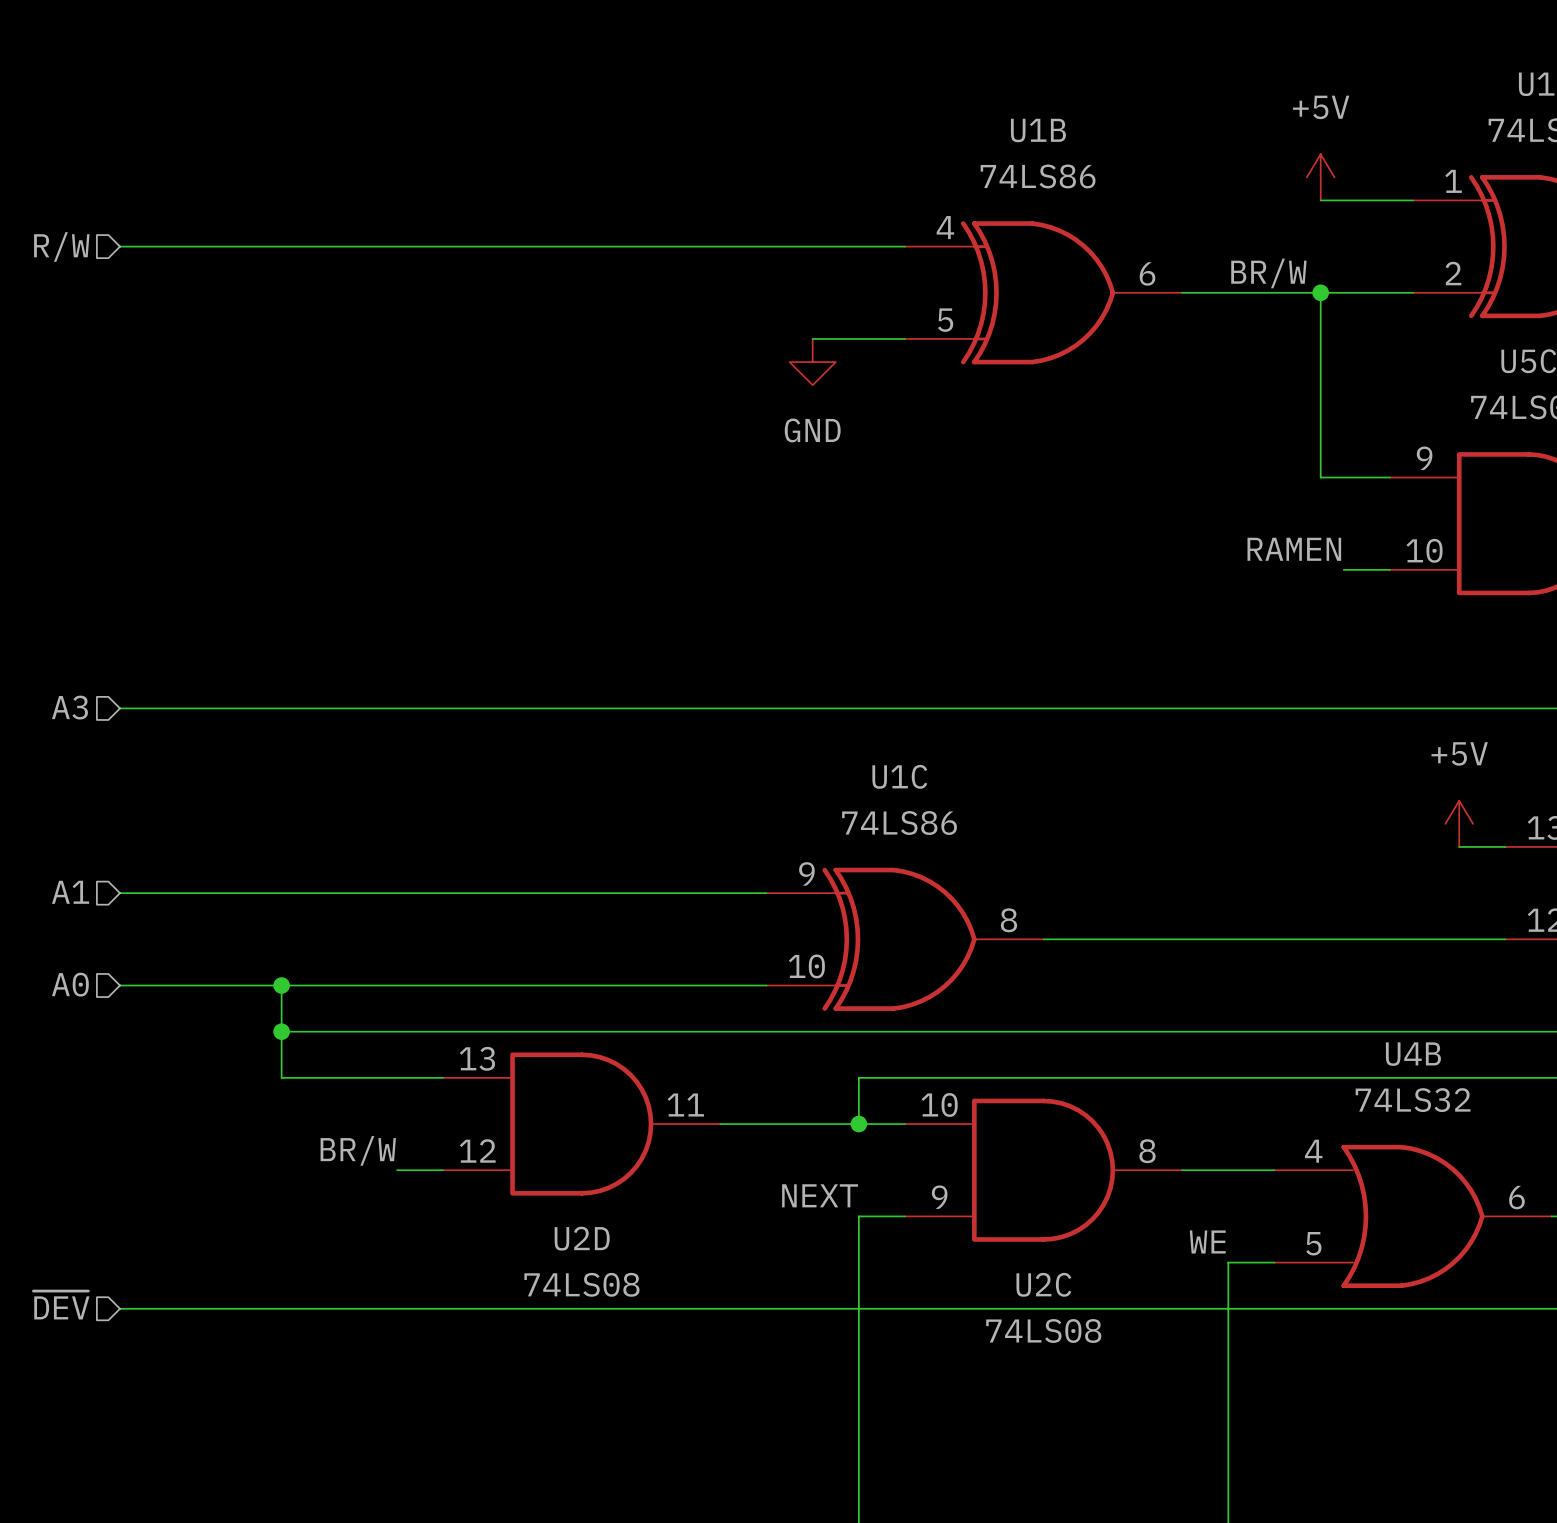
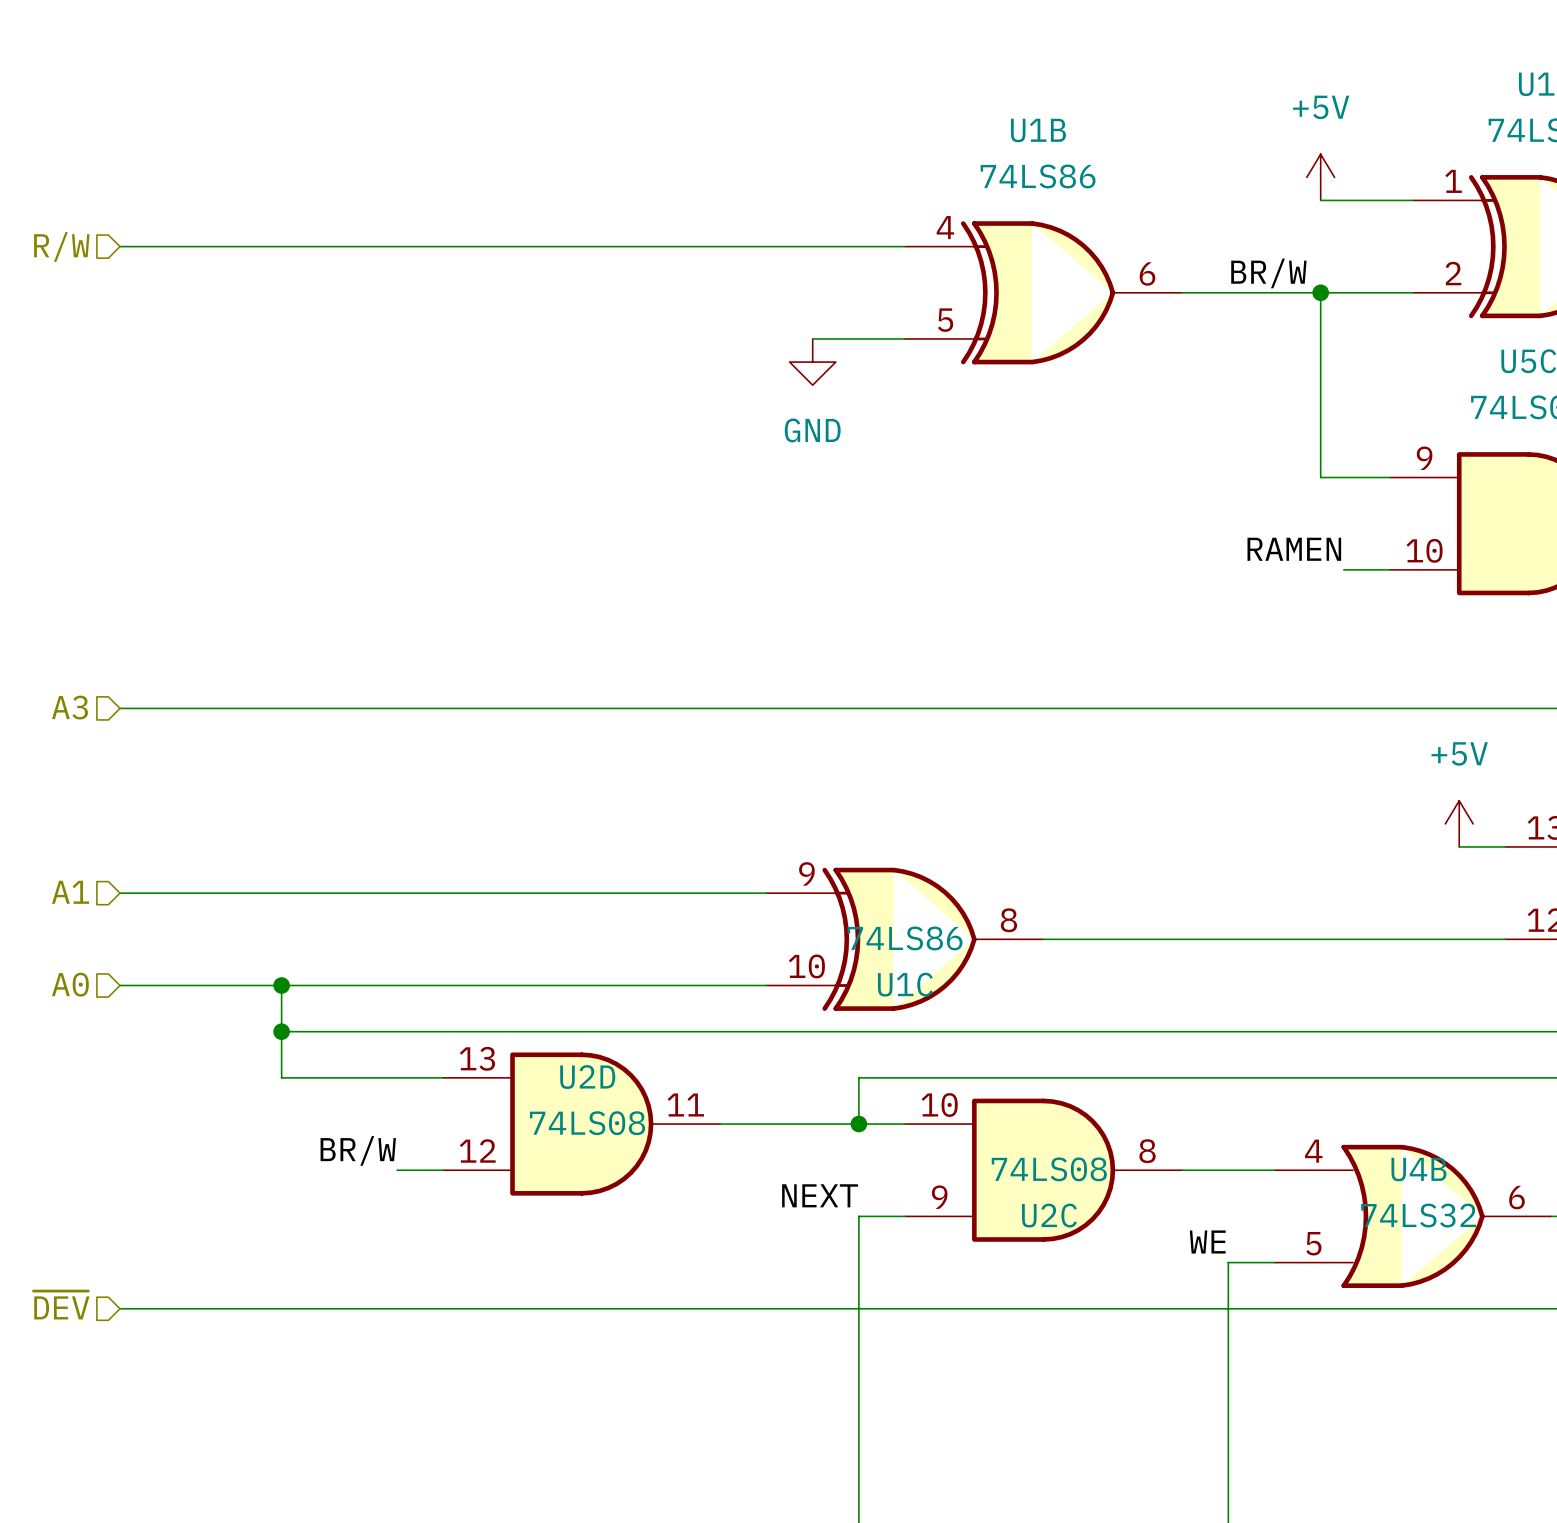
U1C name position: U1C (899, 776) -> U1C (905, 984)
U1C value position: 74LS86 (899, 823) -> 74LS86 (905, 938)
U4B name position: U4B (1413, 1054) -> U4B (1418, 1169)
U4B value position: 74LS32 (1413, 1100) -> 74LS32 (1418, 1215)
U2D name position: U2D (582, 1238) -> U2D (587, 1077)
U2D value position: 74LS08 (581, 1284) -> 74LS08 (587, 1123)
U2C name position: U2C (1043, 1284) -> U2C (1049, 1215)
U2C value position: 74LS08 (1043, 1331) -> 74LS08 (1049, 1169)

